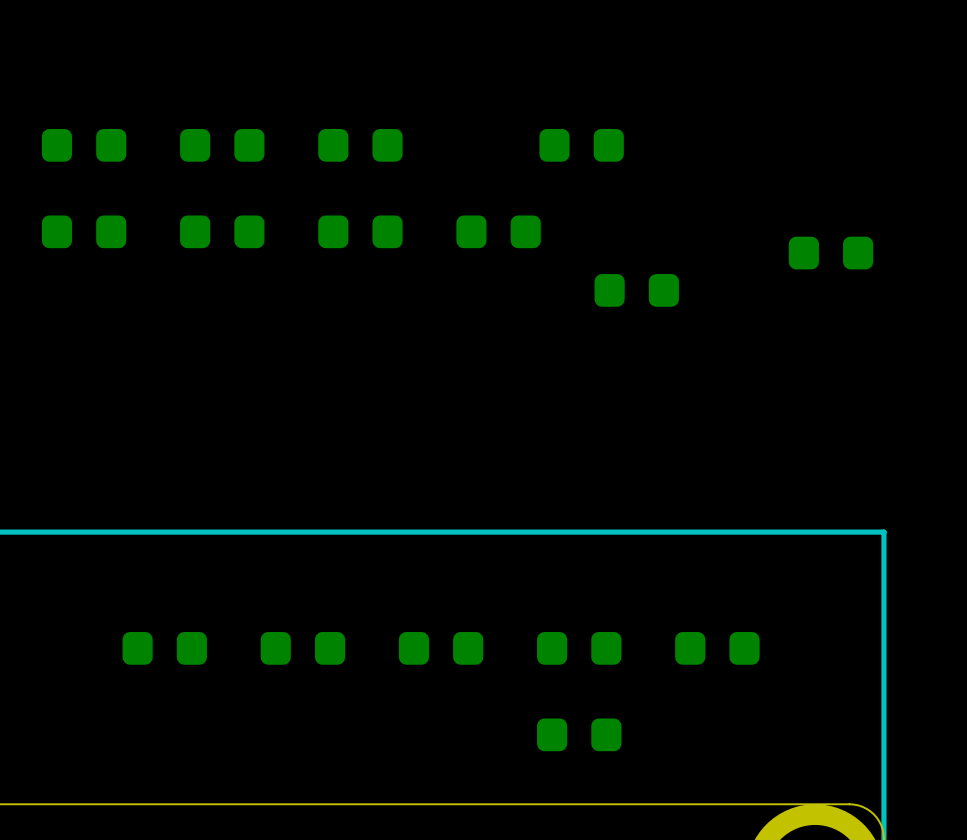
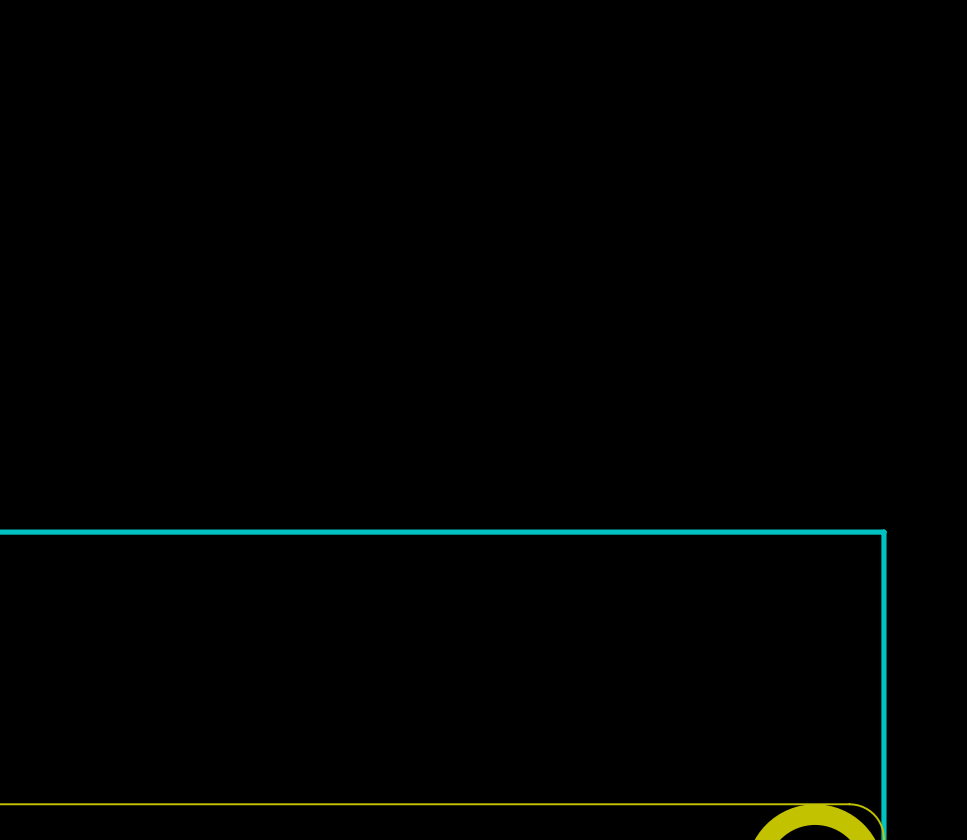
part: (84, 145) -> none
part: (222, 145) -> none
part: (360, 145) -> none
part: (581, 145) -> none
part: (84, 231) -> none
part: (222, 231) -> none
part: (360, 231) -> none
part: (498, 231) -> none
part: (830, 253) -> none
part: (636, 290) -> none
part: (164, 648) -> none
part: (302, 648) -> none
part: (441, 648) -> none
part: (579, 648) -> none
part: (717, 648) -> none
part: (579, 734) -> none

